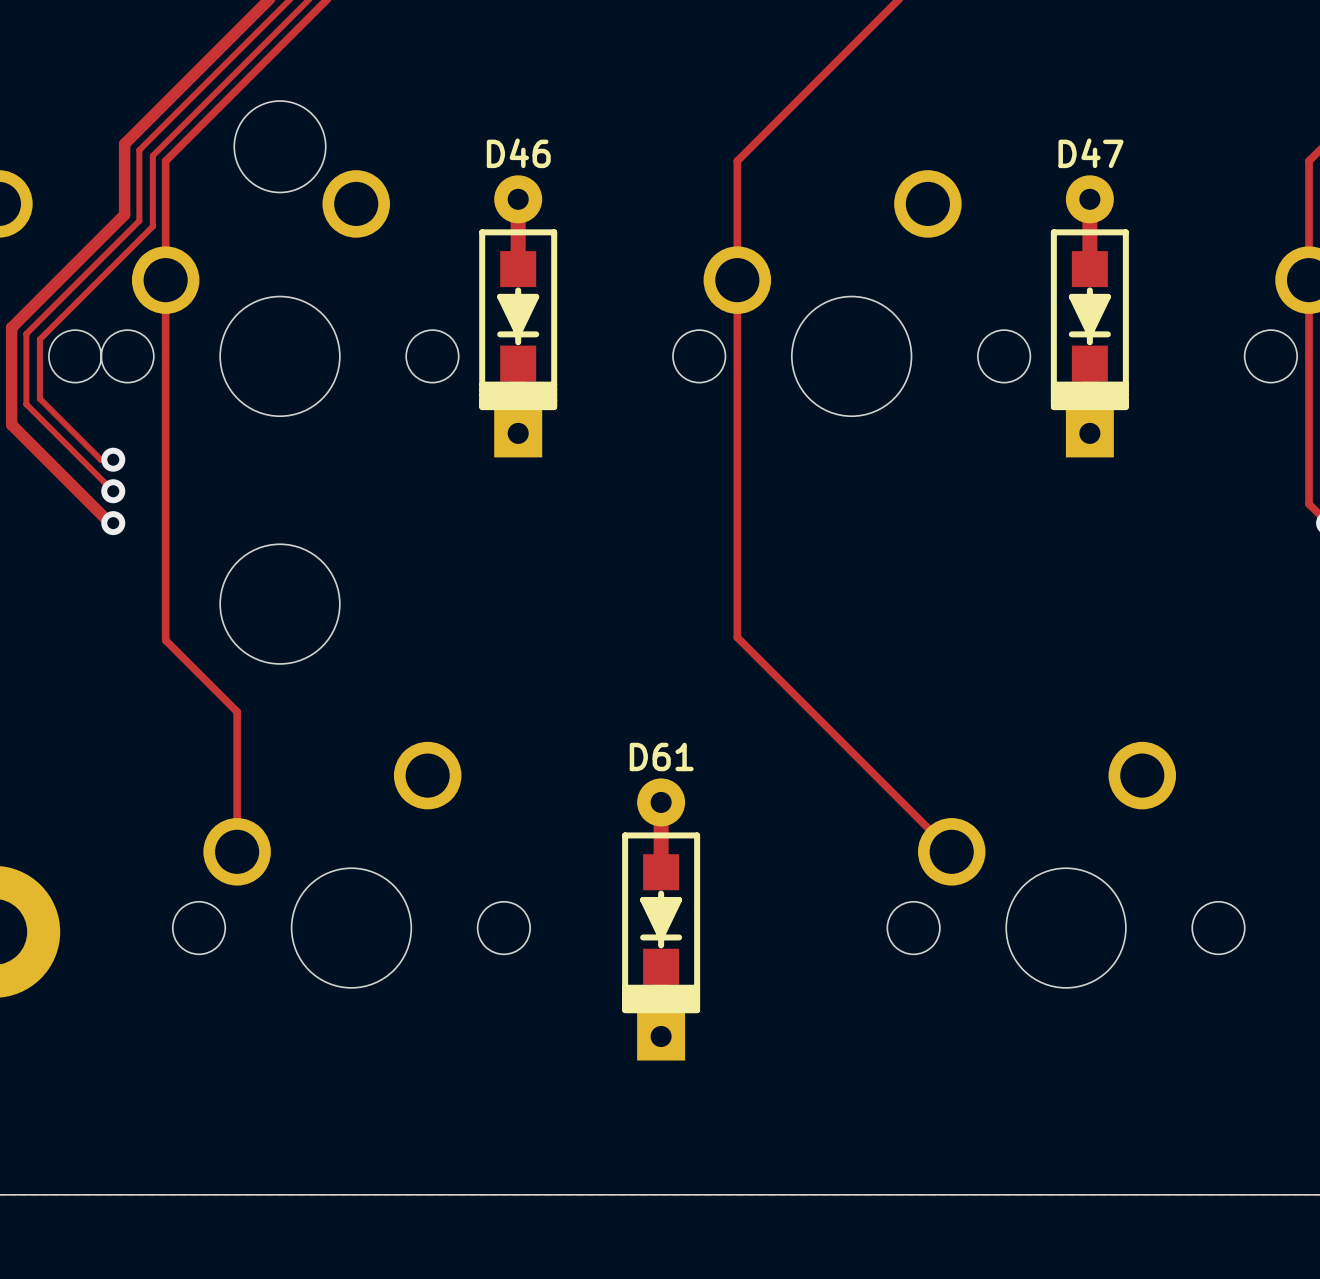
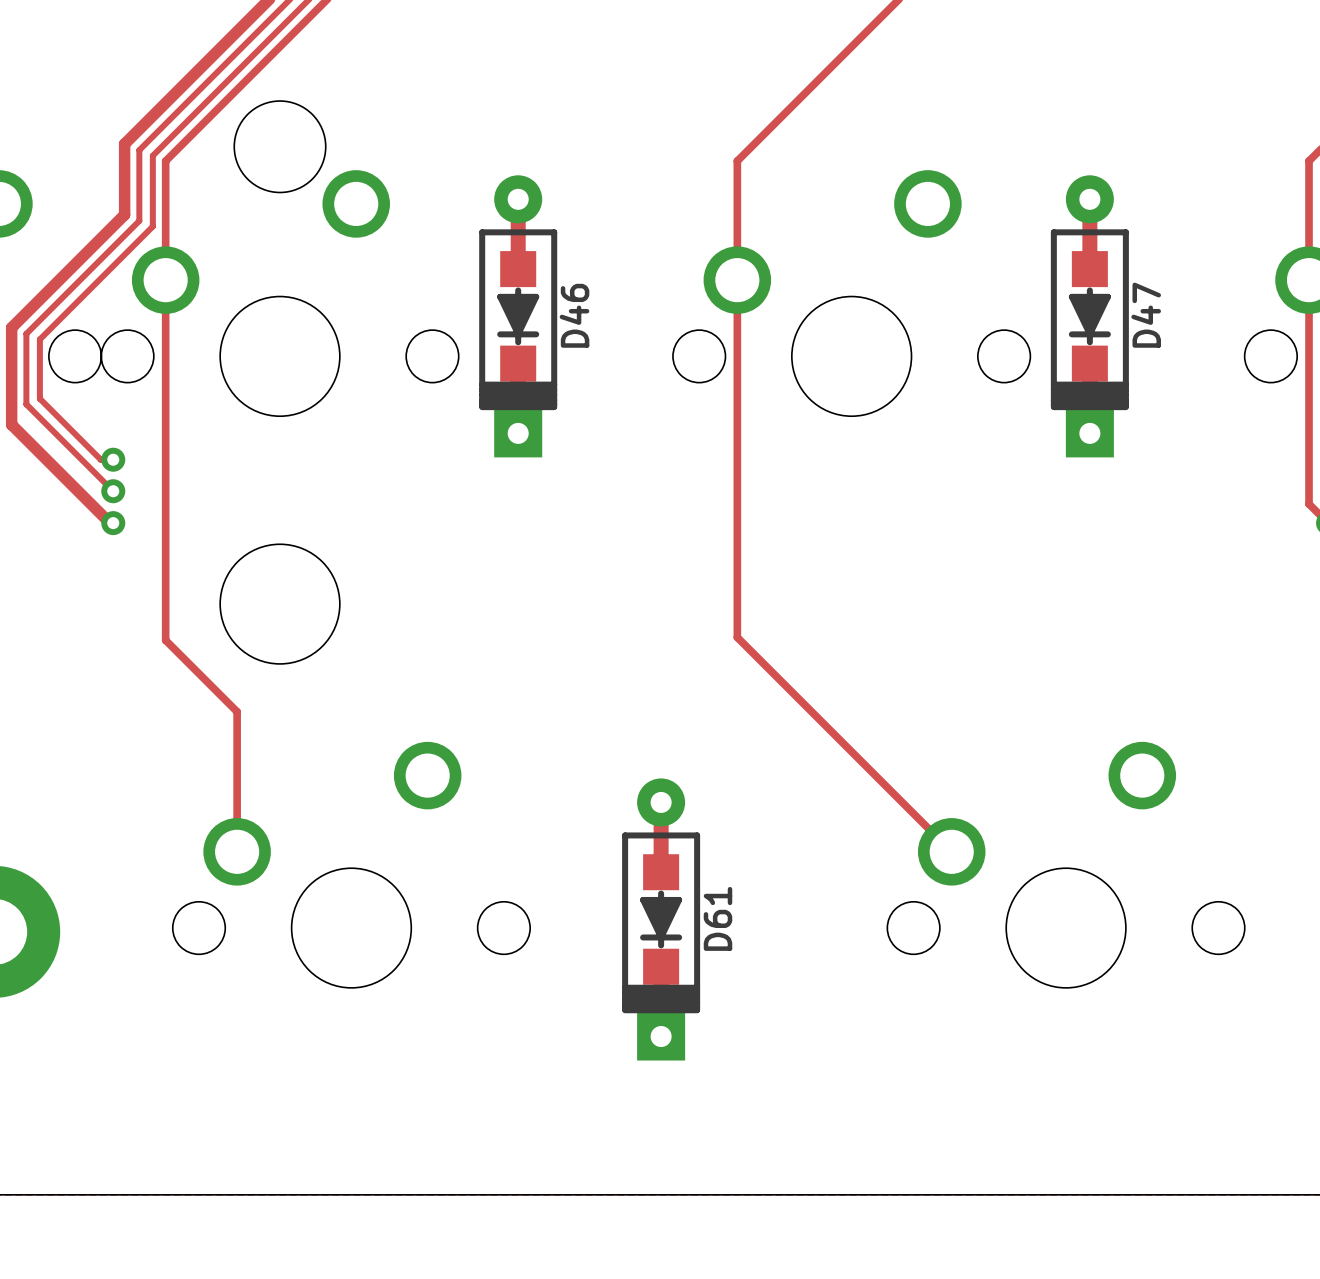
D46 name rotation: 0° (518, 153) -> 90° counterclockwise (574, 315)
D46 name position: D46 (518, 153) -> D46 (574, 315)
D47 name rotation: 0° (1091, 153) -> 90° counterclockwise (1146, 315)
D47 name position: D47 (1091, 153) -> D47 (1146, 315)
D61 name rotation: 0° (661, 756) -> 90° counterclockwise (717, 918)
D61 name position: D61 (661, 756) -> D61 (717, 918)

